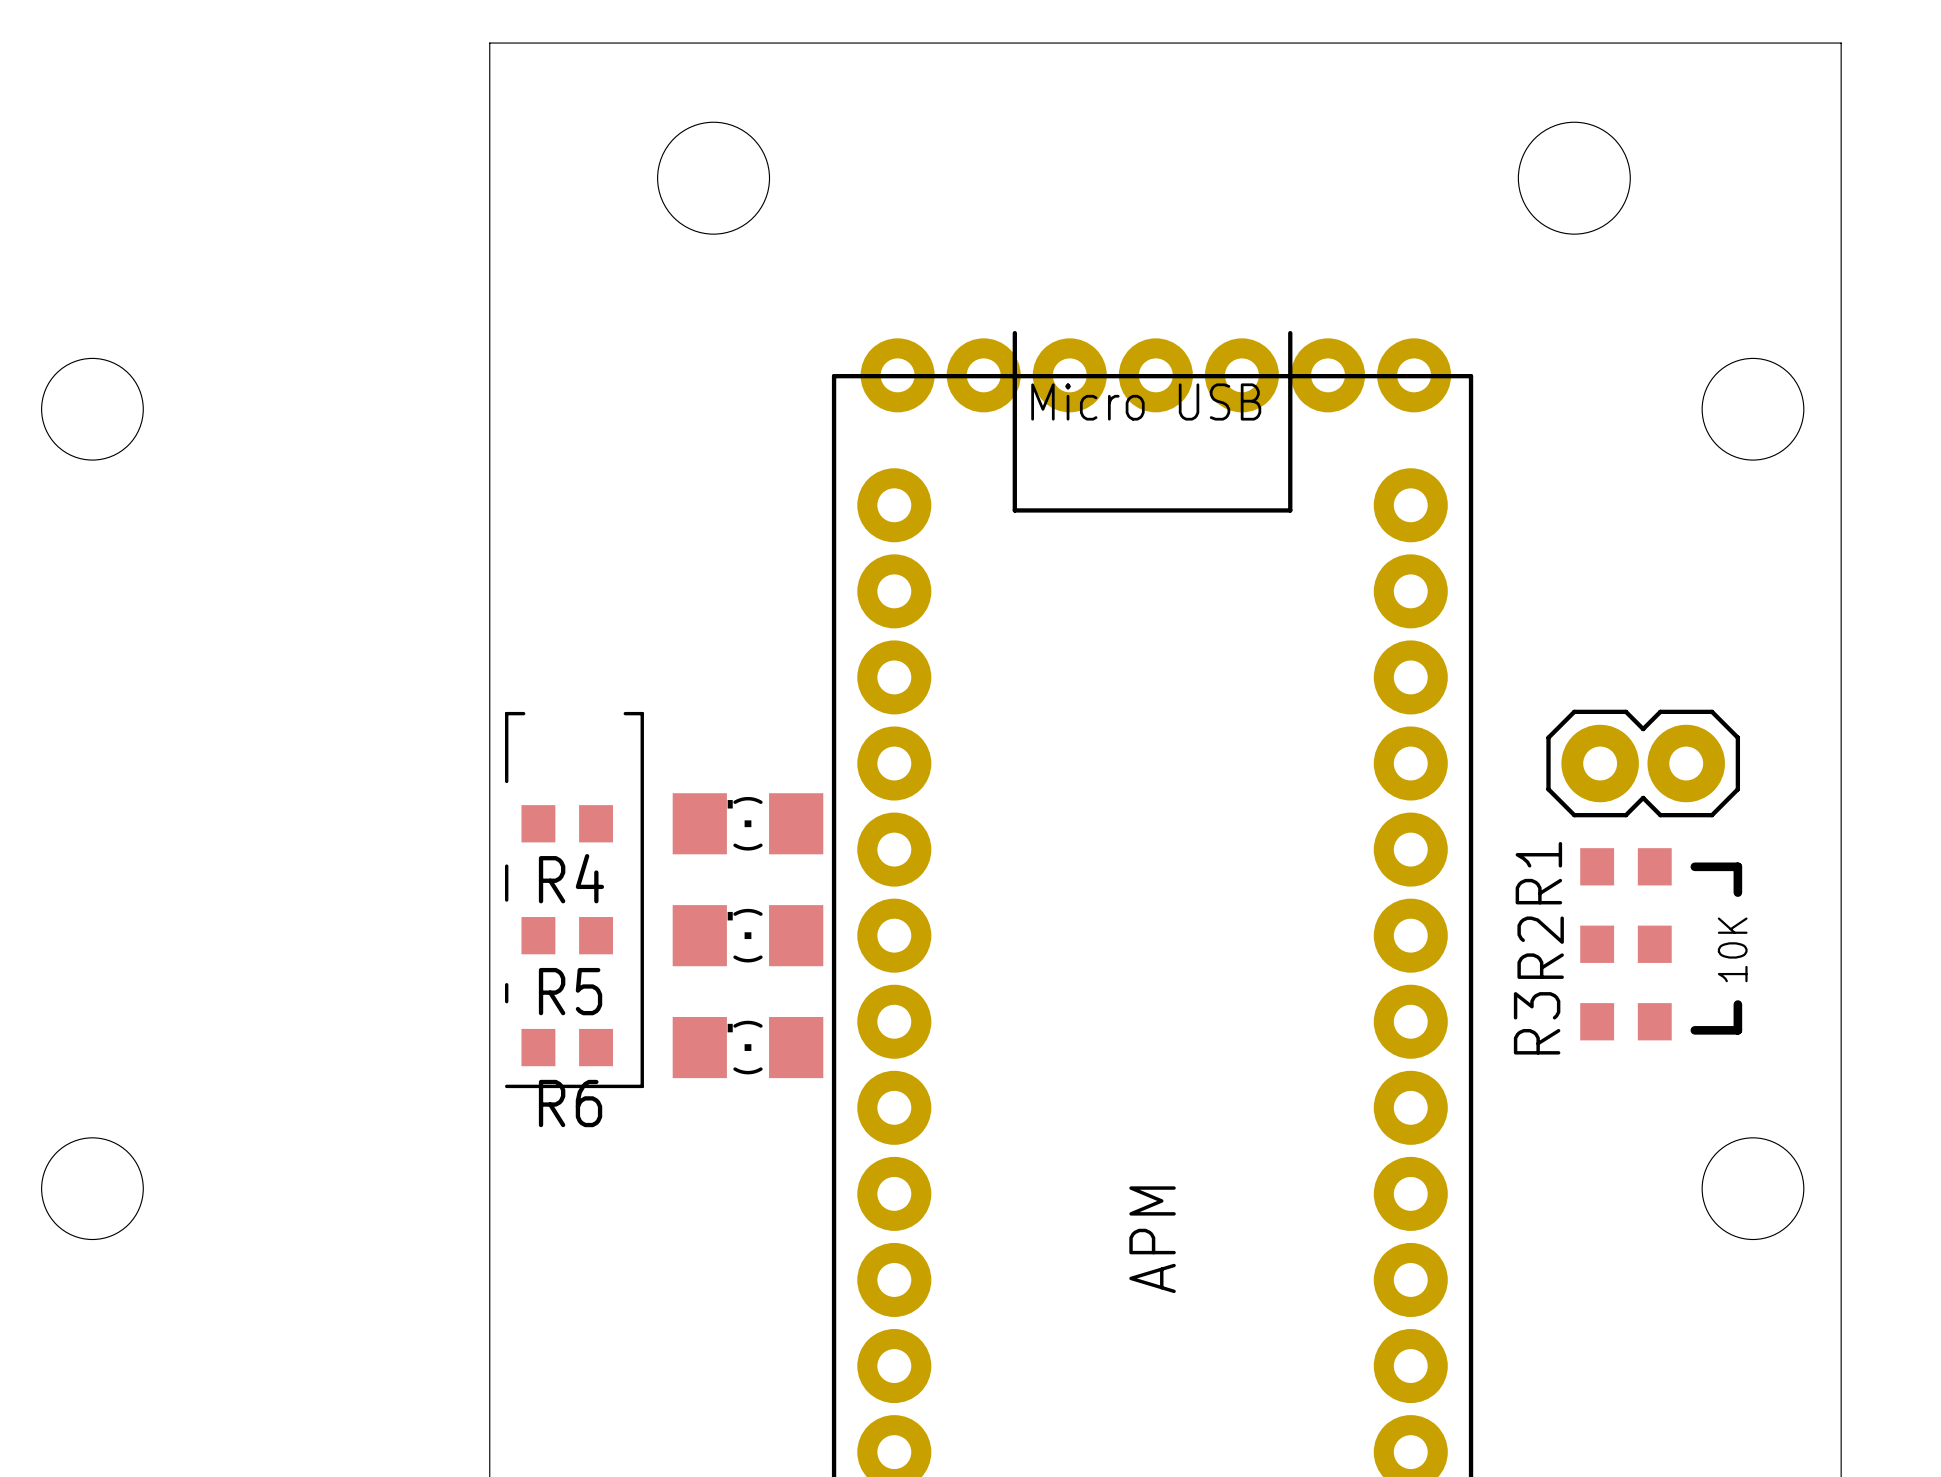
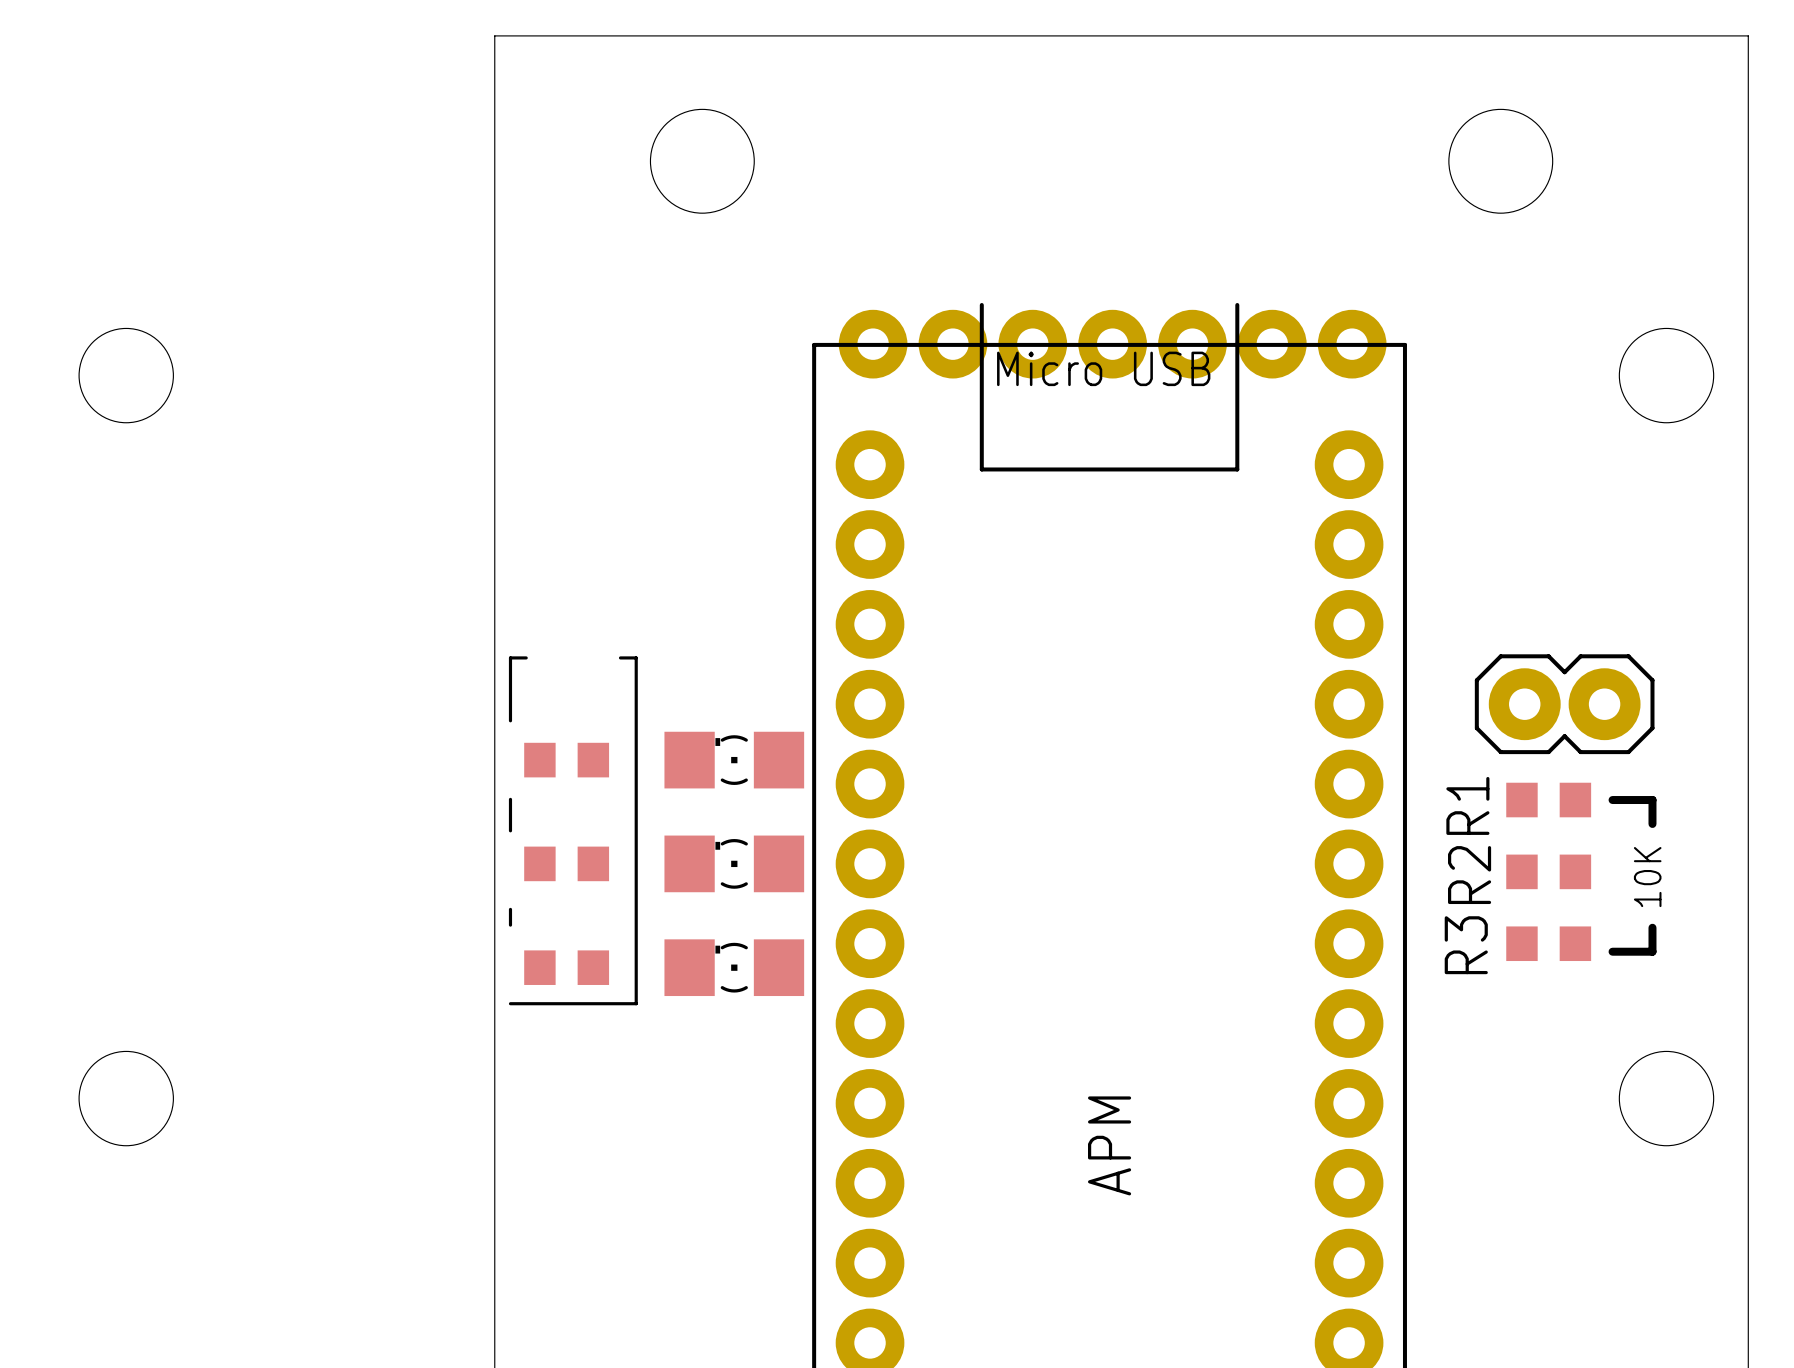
R4 name: R4 (571, 878) -> none
R5 name: R5 (570, 991) -> none
R6 name: R6 (570, 1103) -> none

